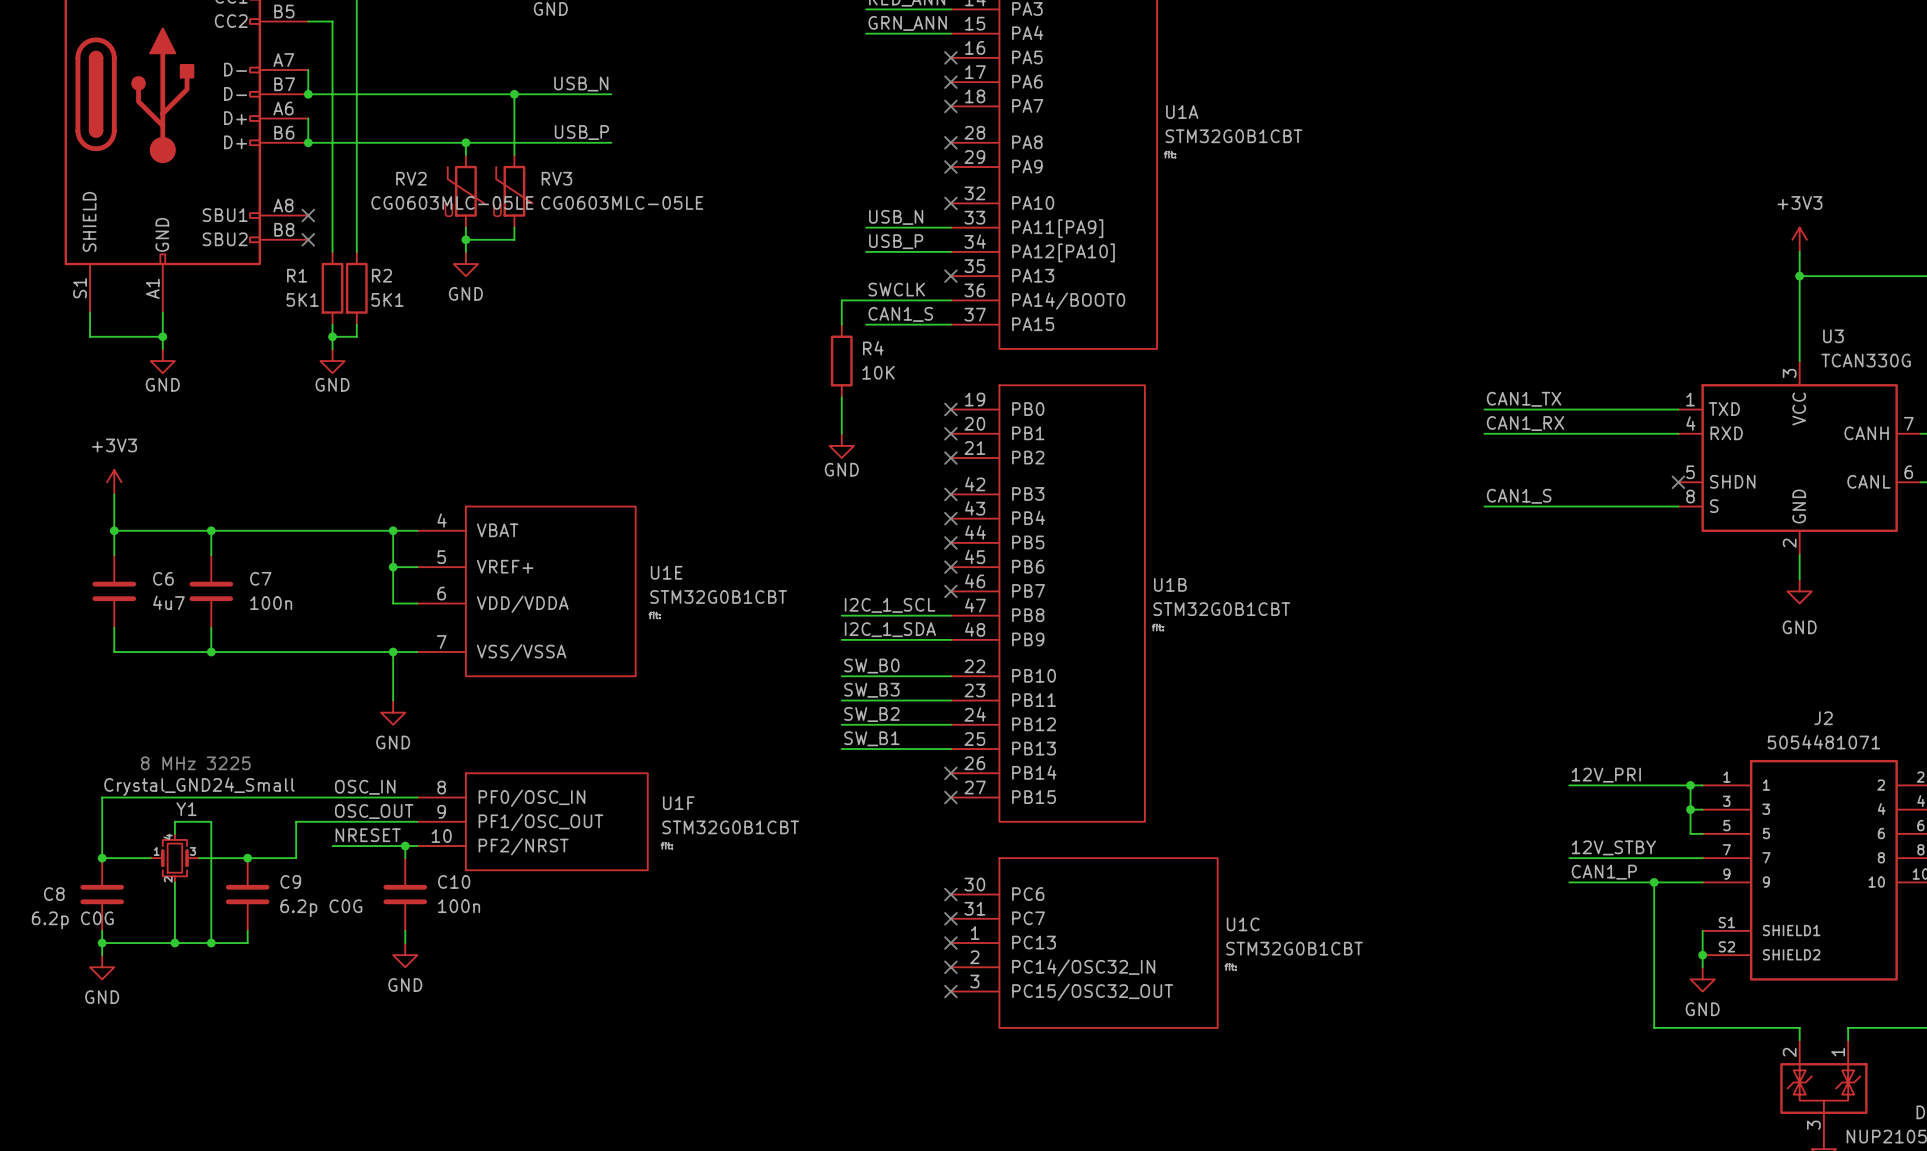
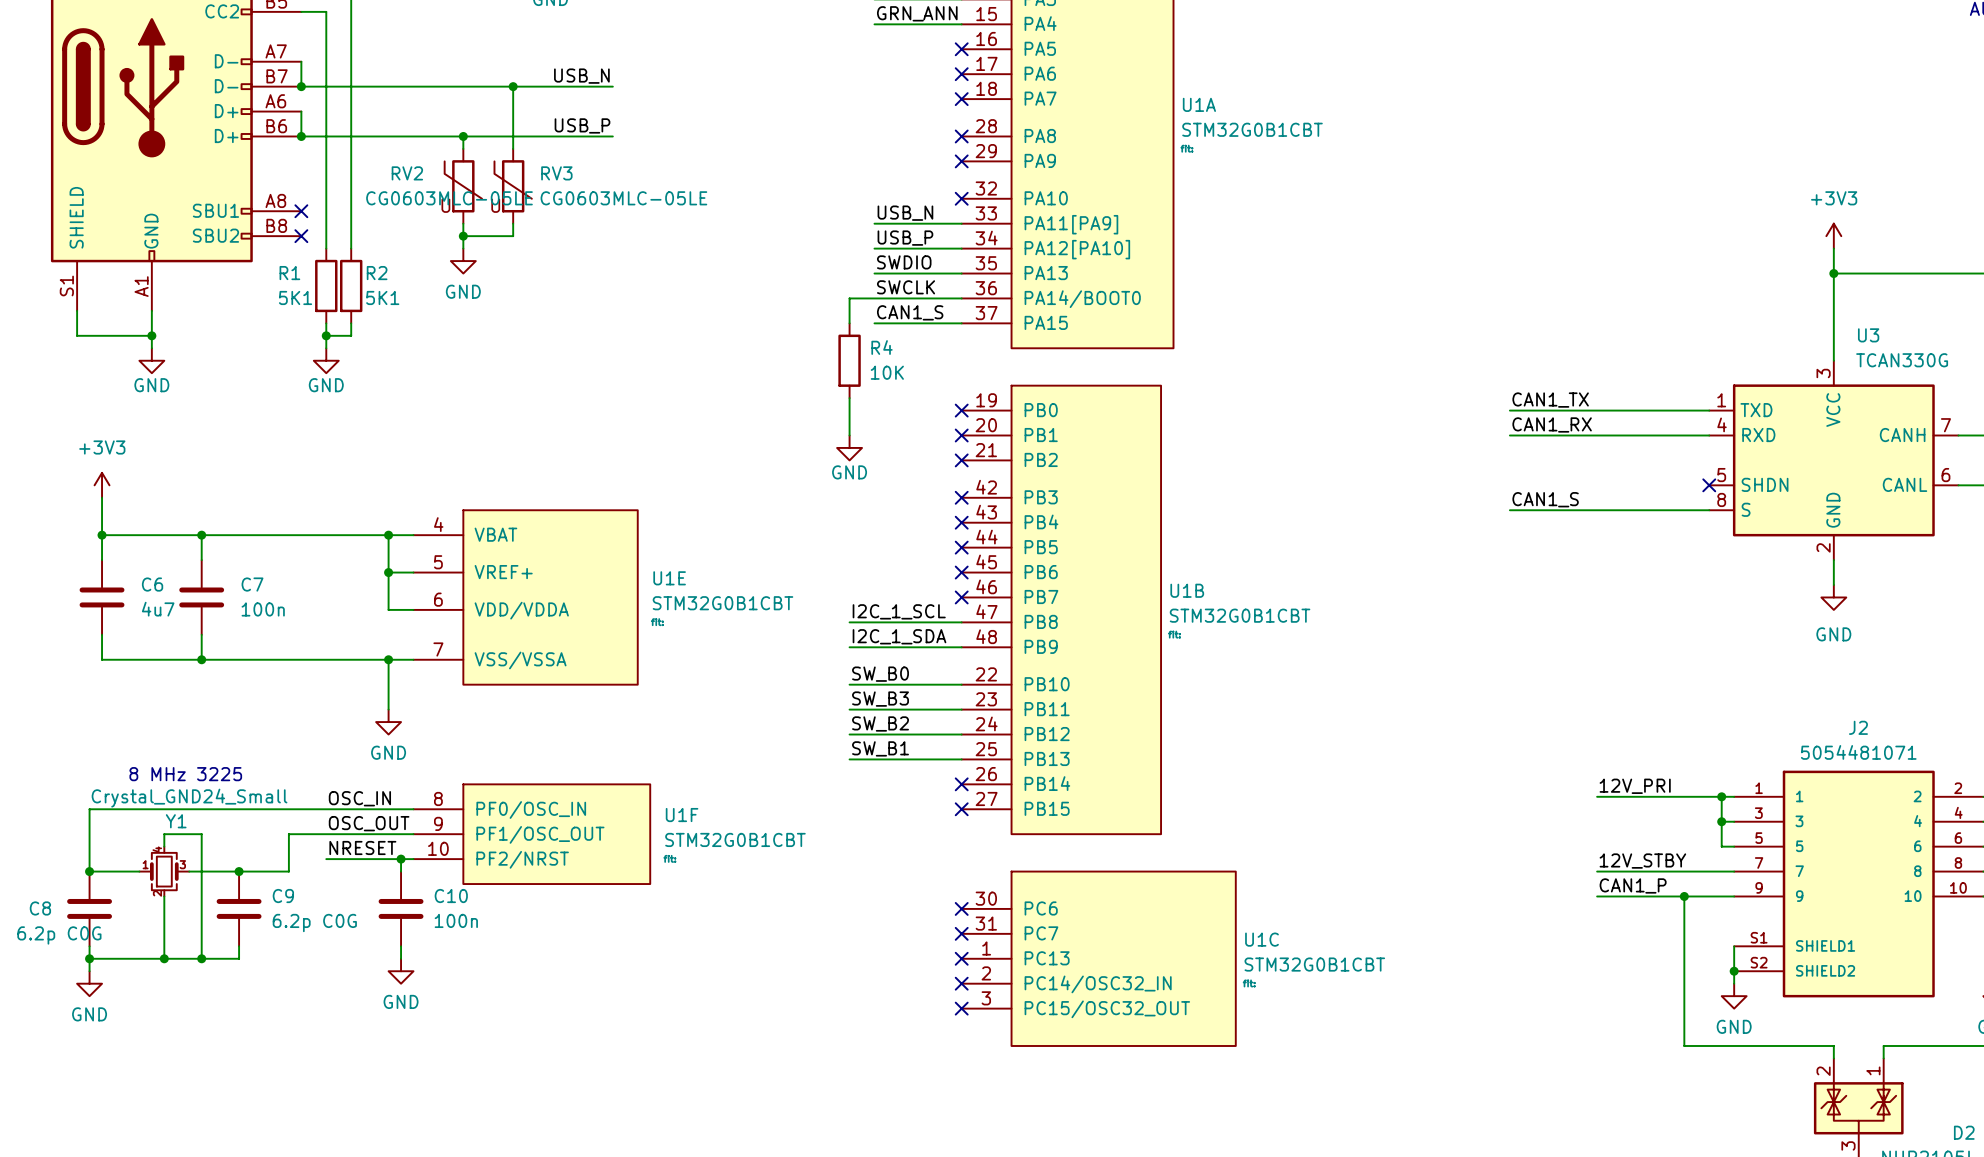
label: none -> SWDIO (904, 262)
wire: none -> (874, 273) (961, 273)
no-connect mark: (950, 276) -> none

